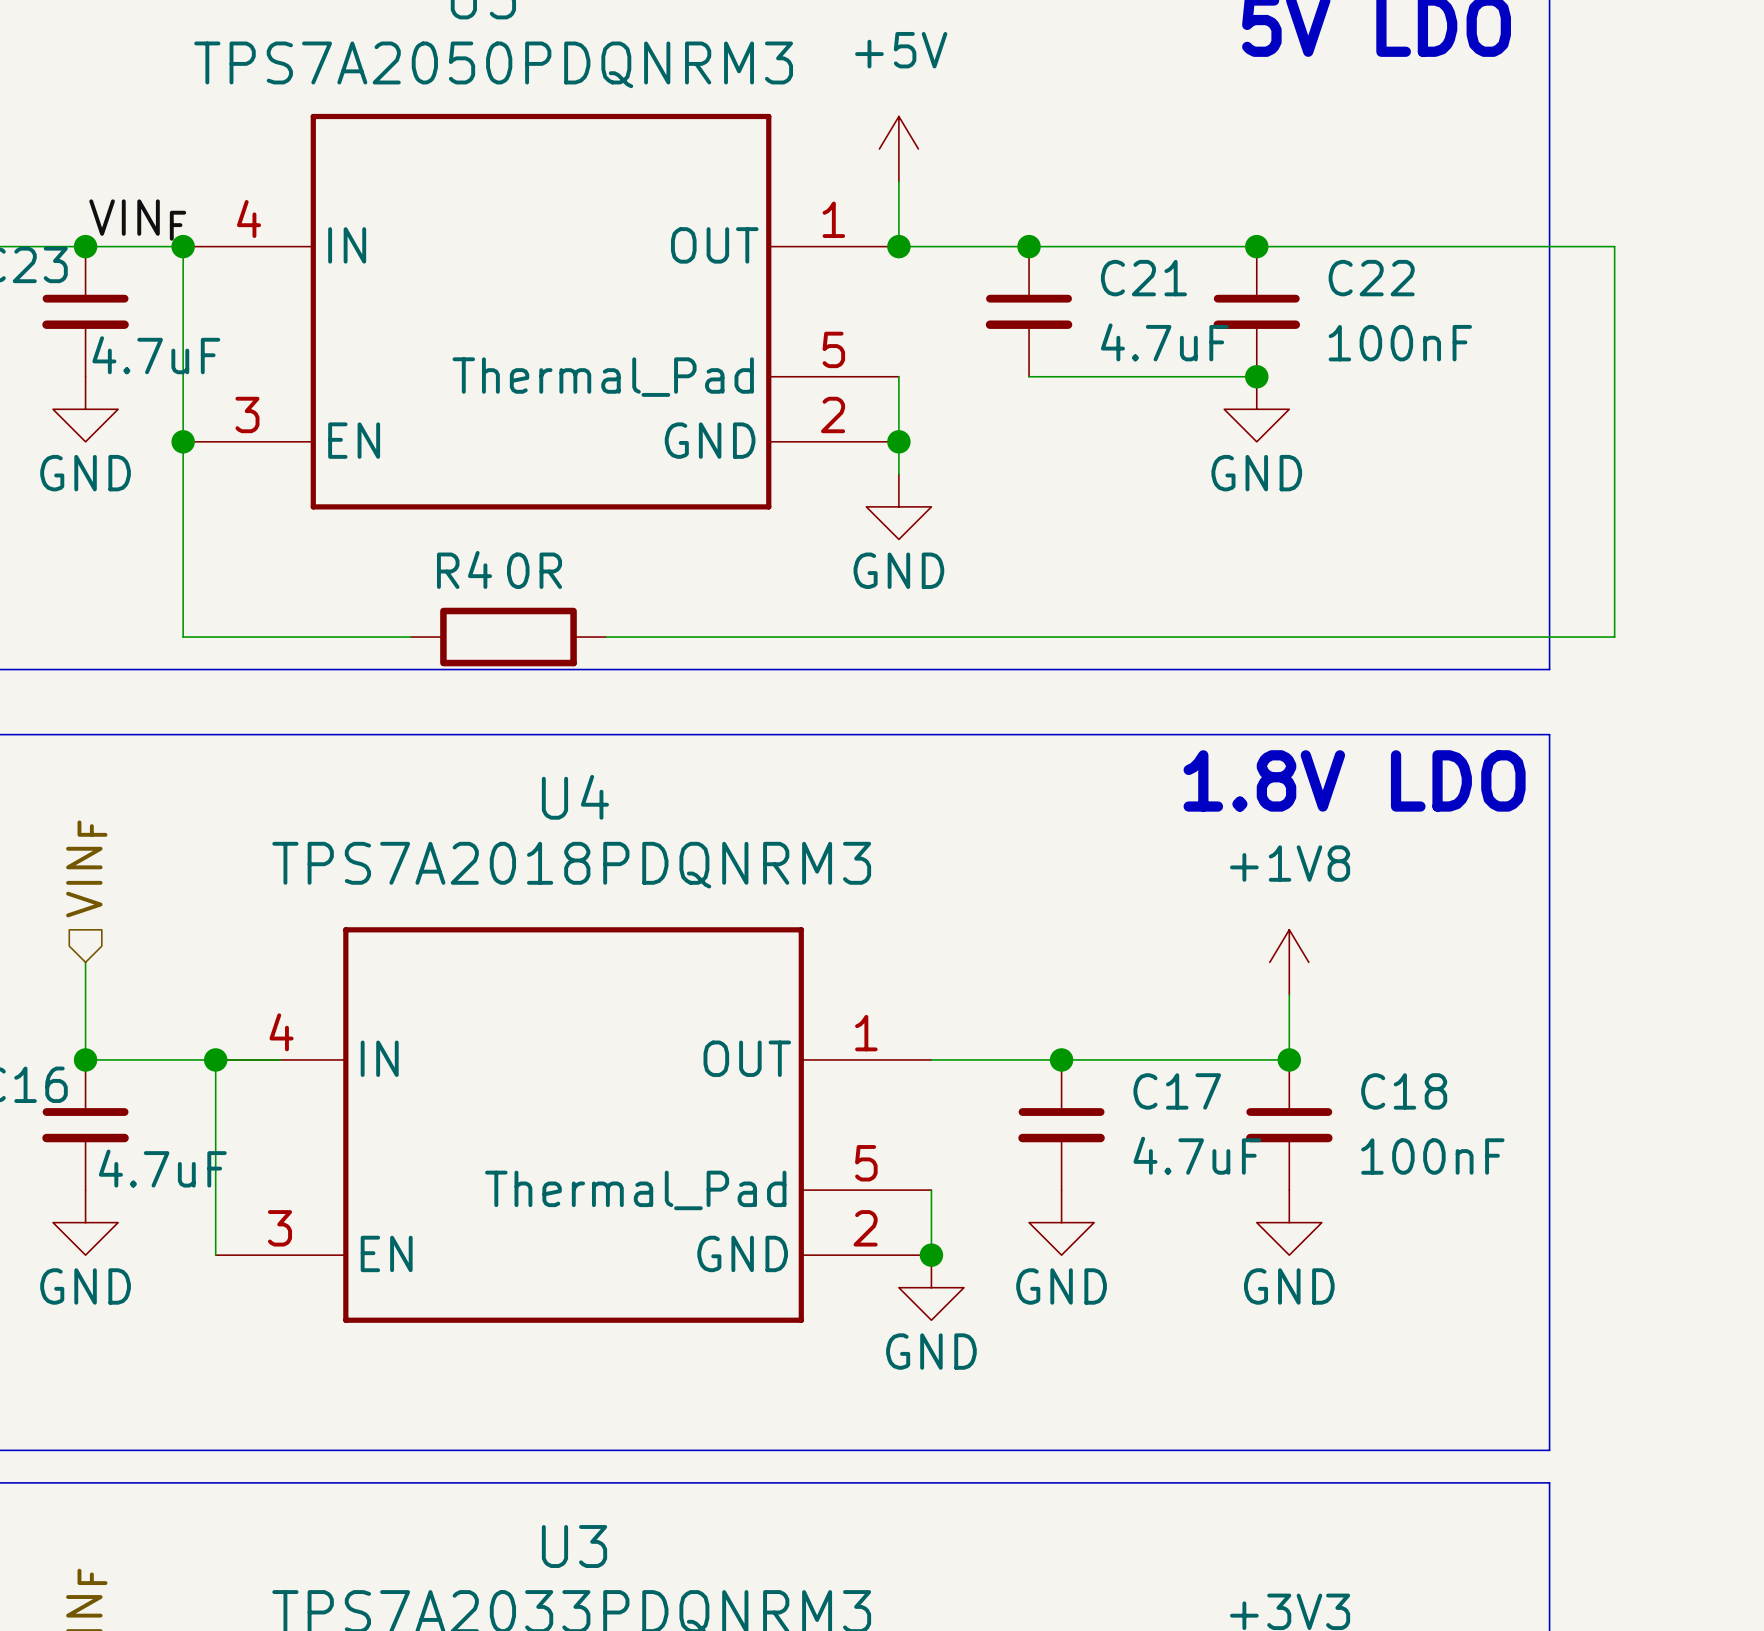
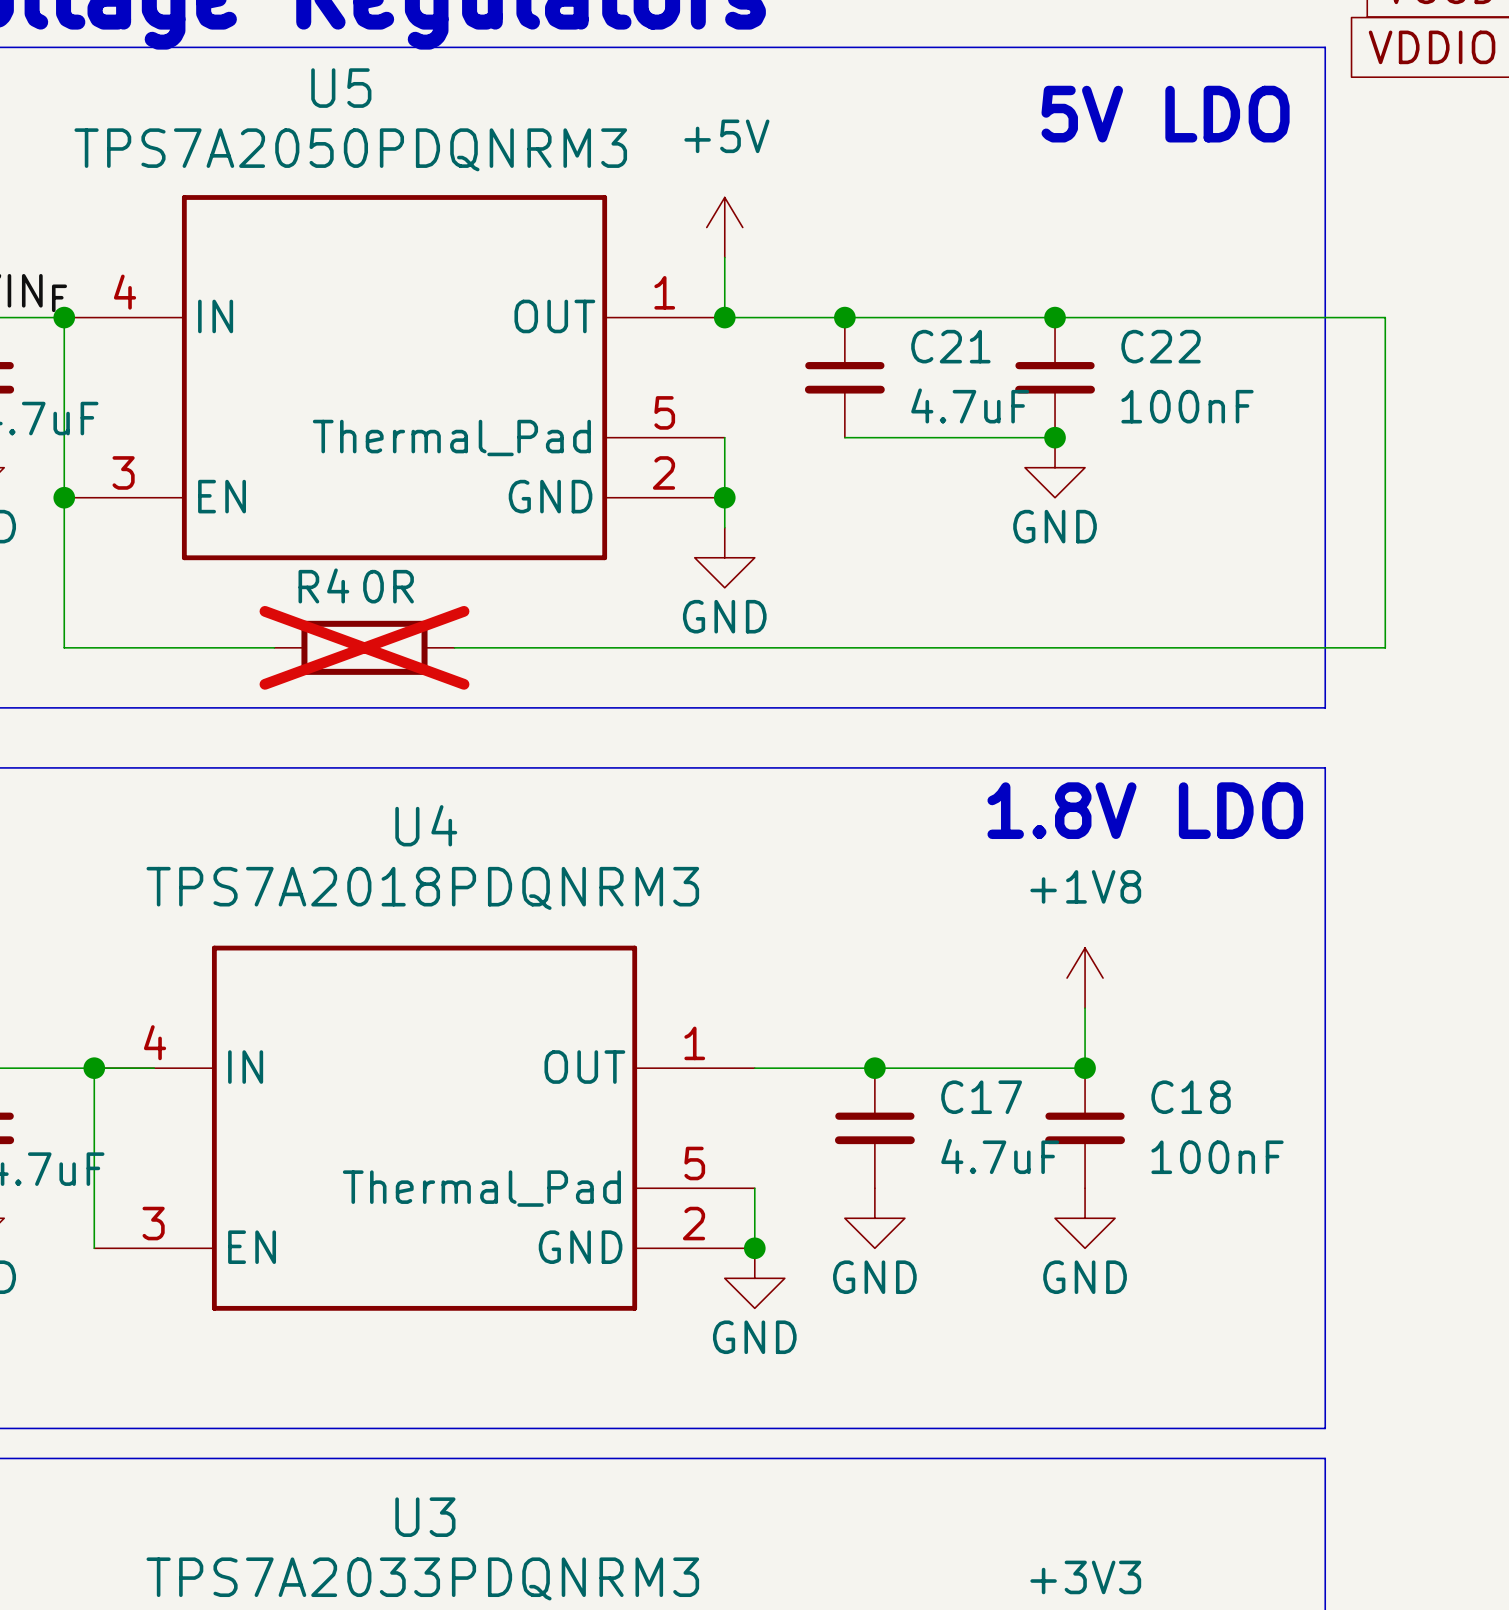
wire: (183, 604) (183, 637) (410, 637) -> (64, 647) (274, 647)
R4 do-not-place cross: none -> (364, 647)
wire: (1614, 604) (1614, 637) (606, 637) -> (1385, 647) (454, 647)
R4 position: (508, 637) -> (364, 647)

